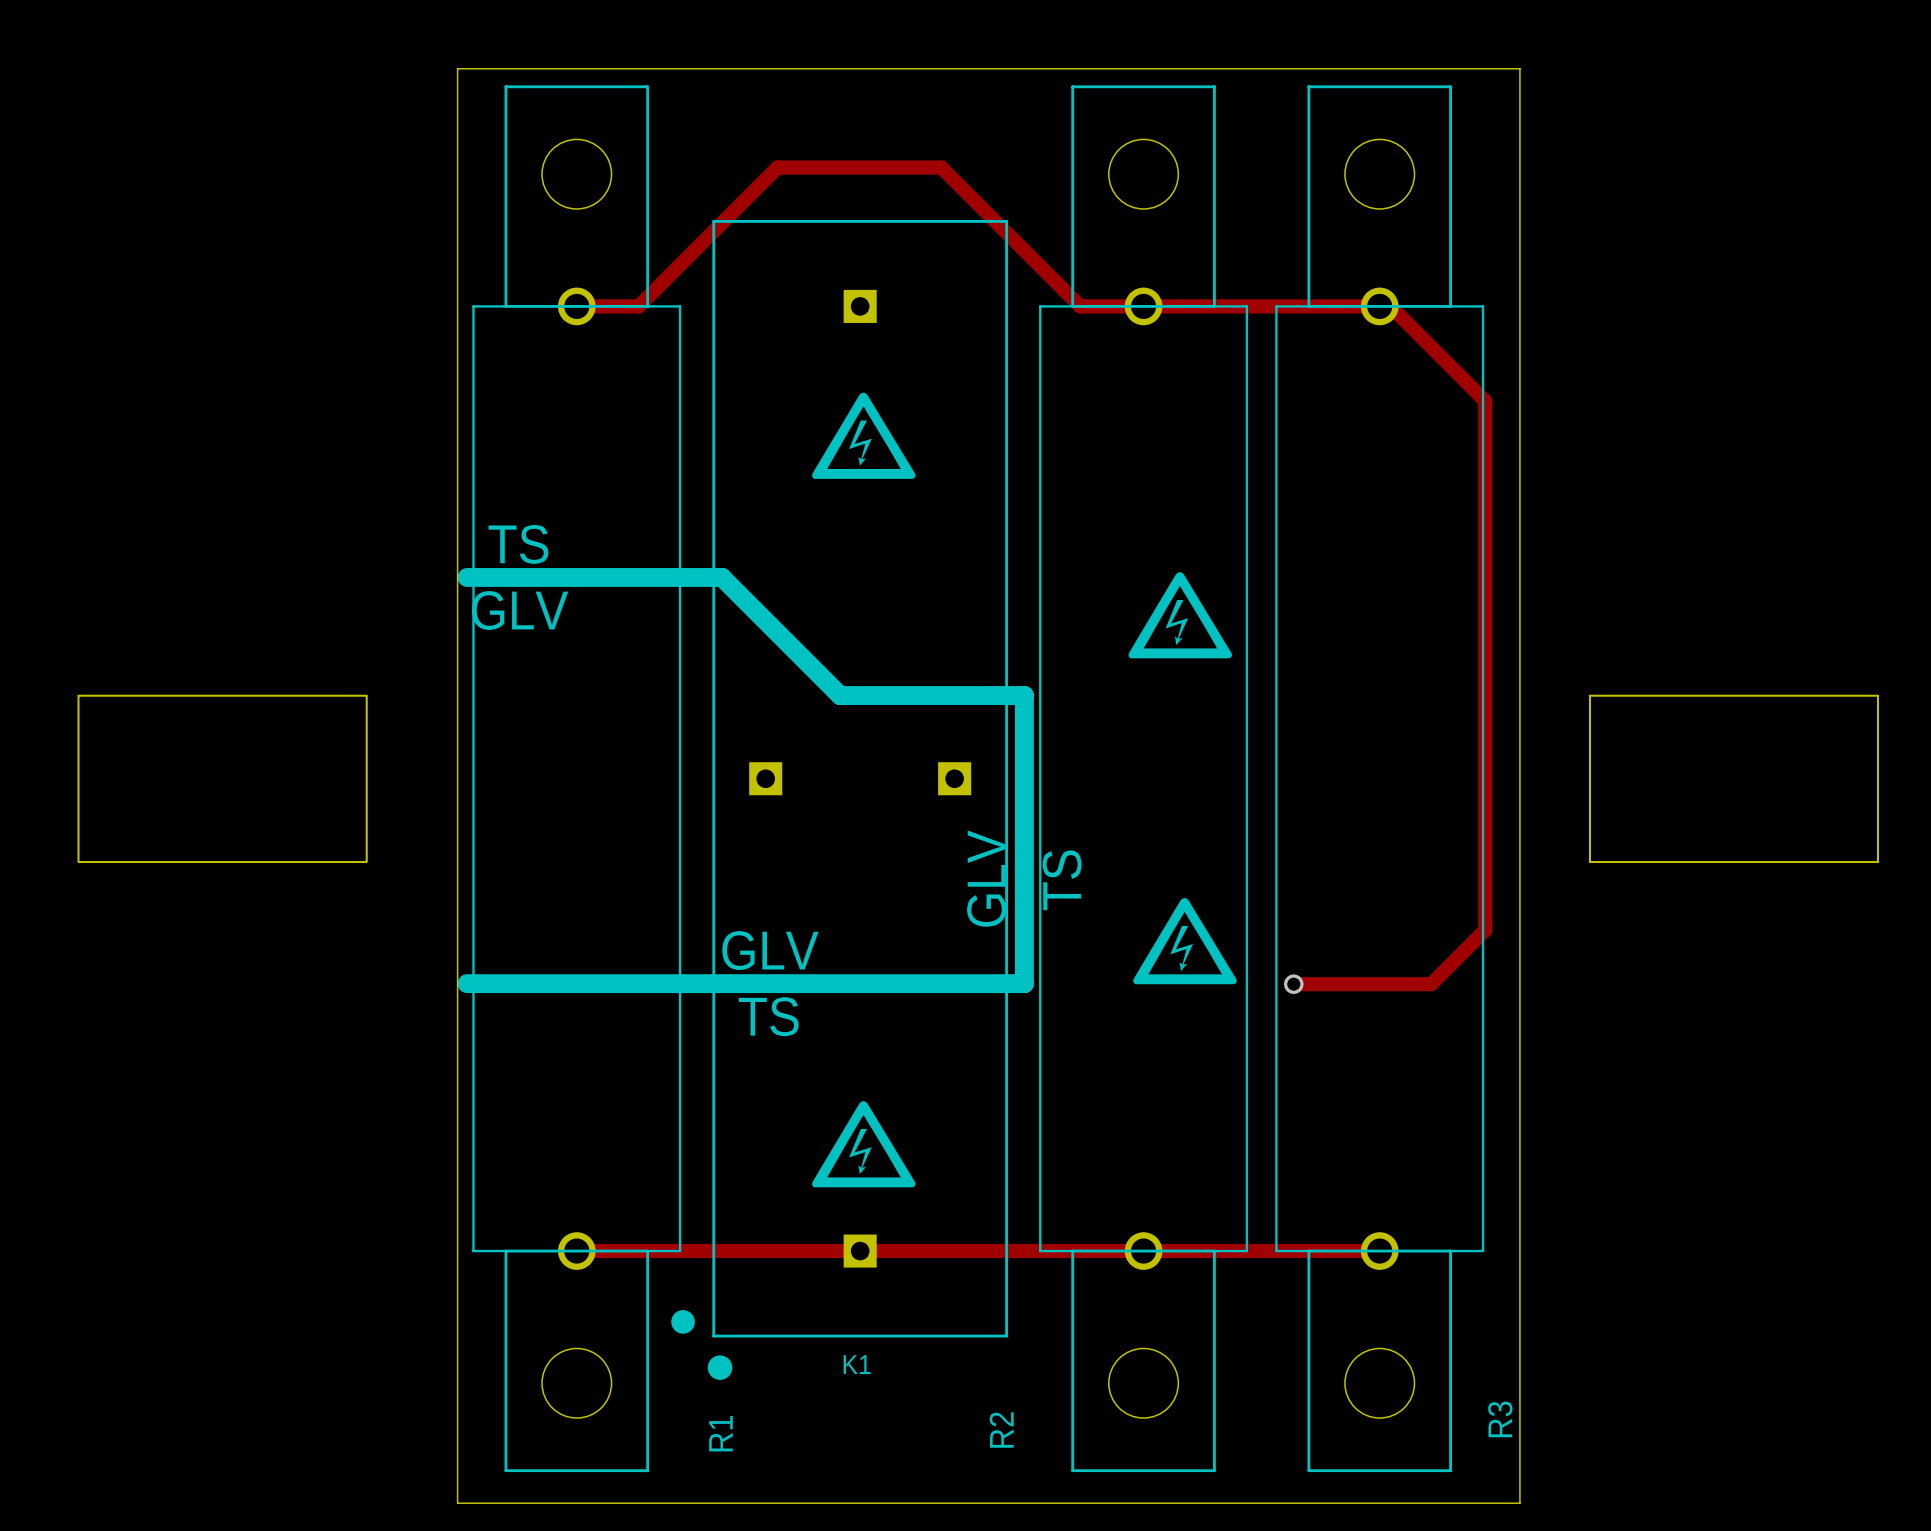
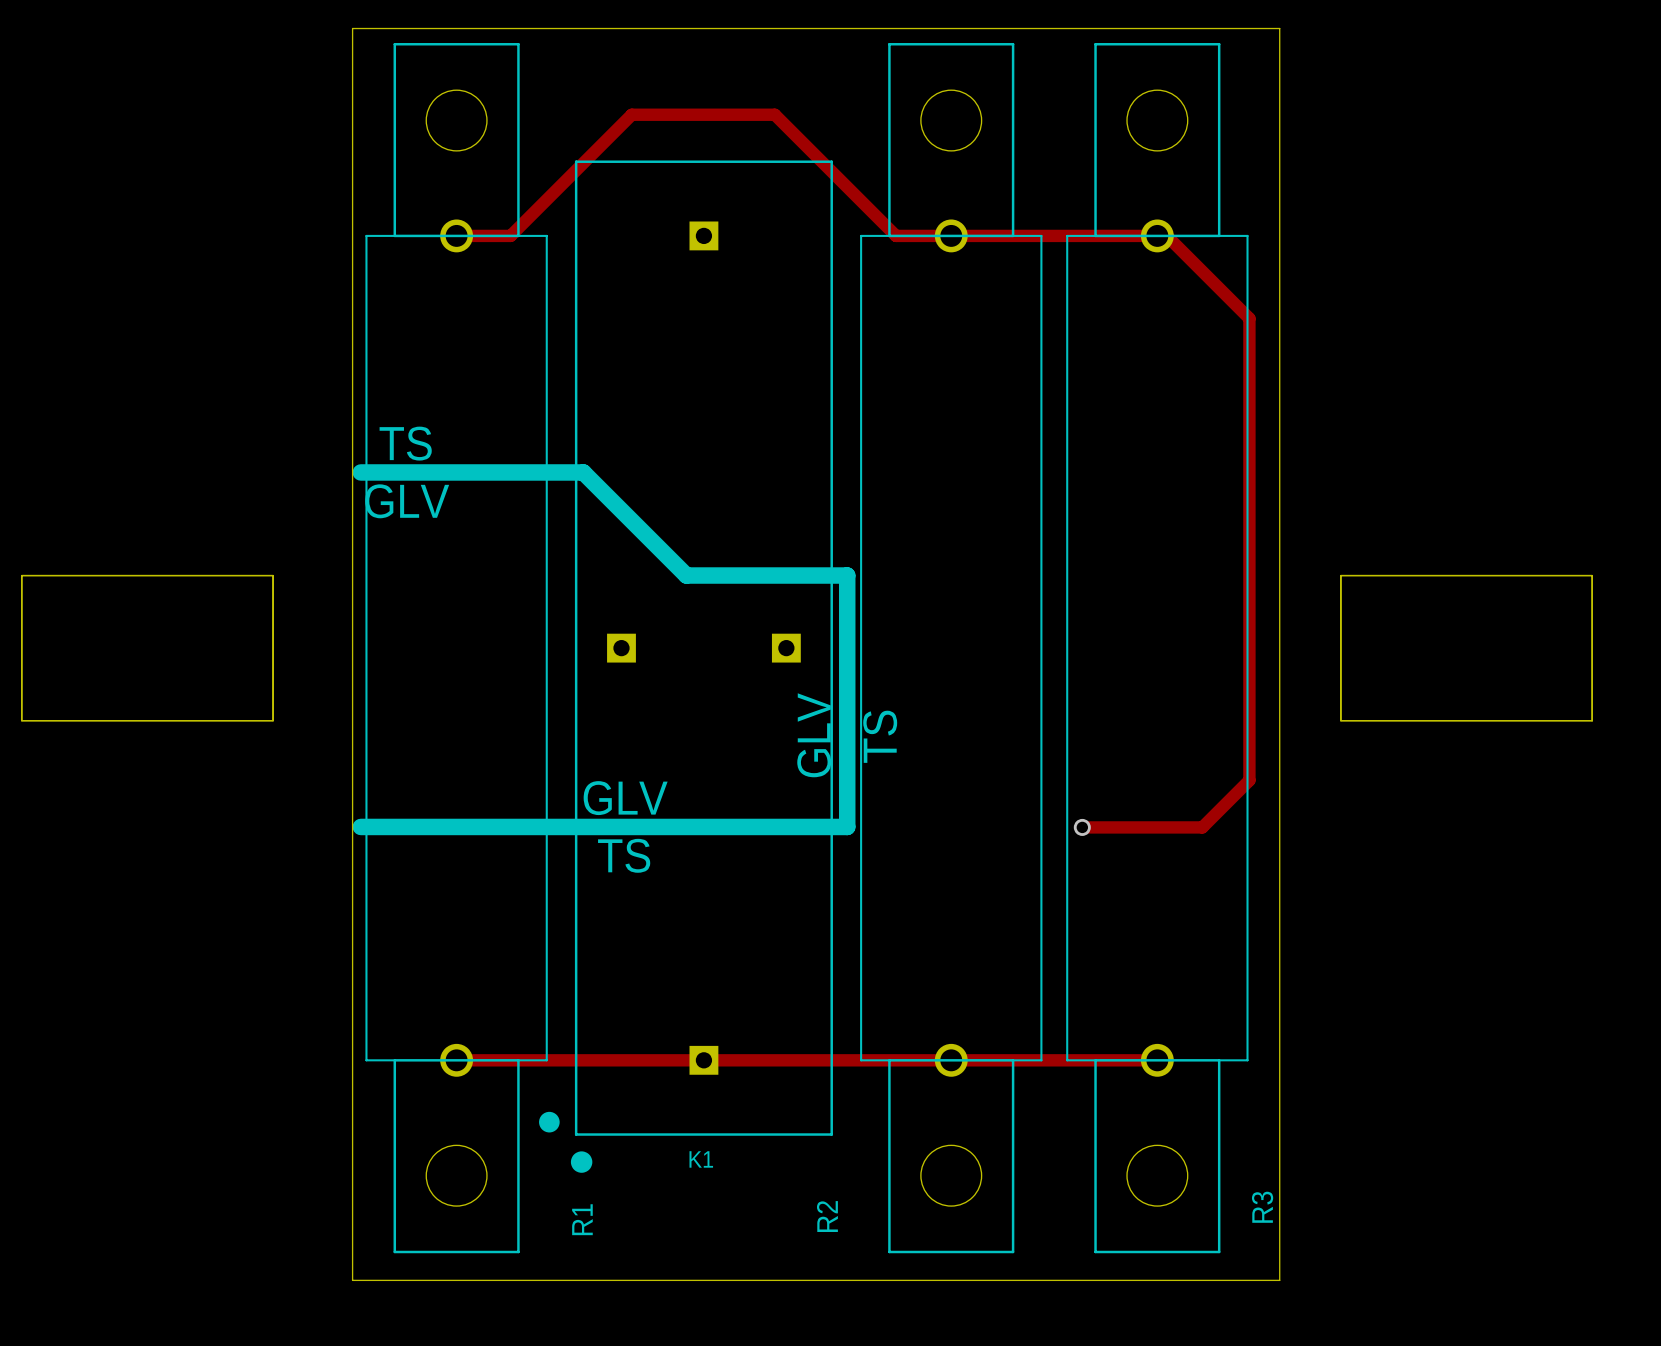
drawing: [812, 392, 916, 479] -> none
drawing: [1128, 572, 1232, 659] -> none
drawing: [1133, 898, 1237, 985] -> none
drawing: [812, 1101, 916, 1188] -> none

